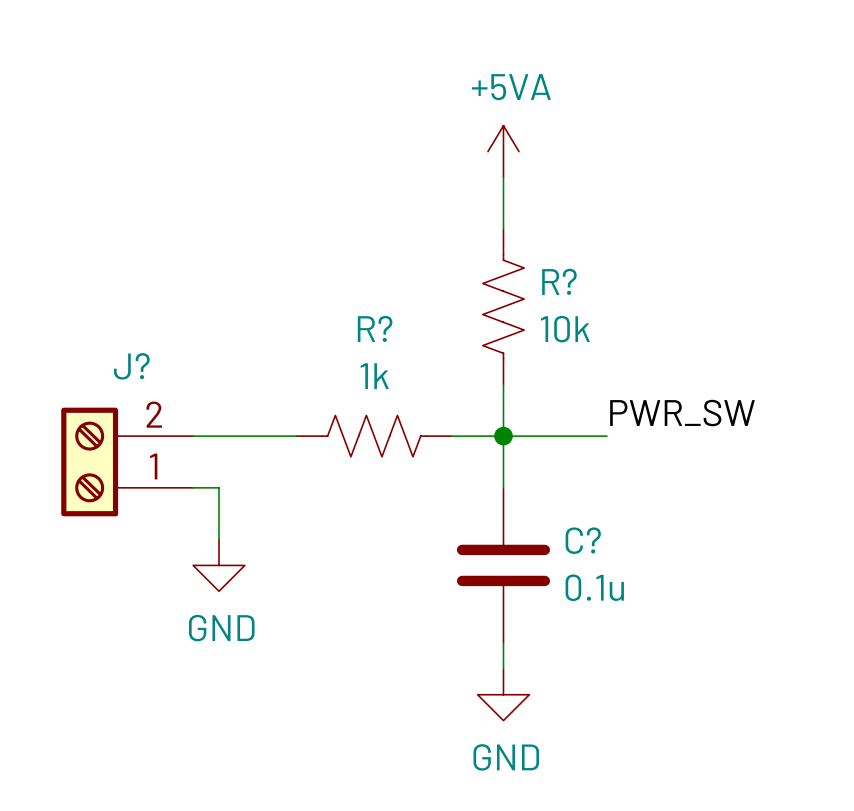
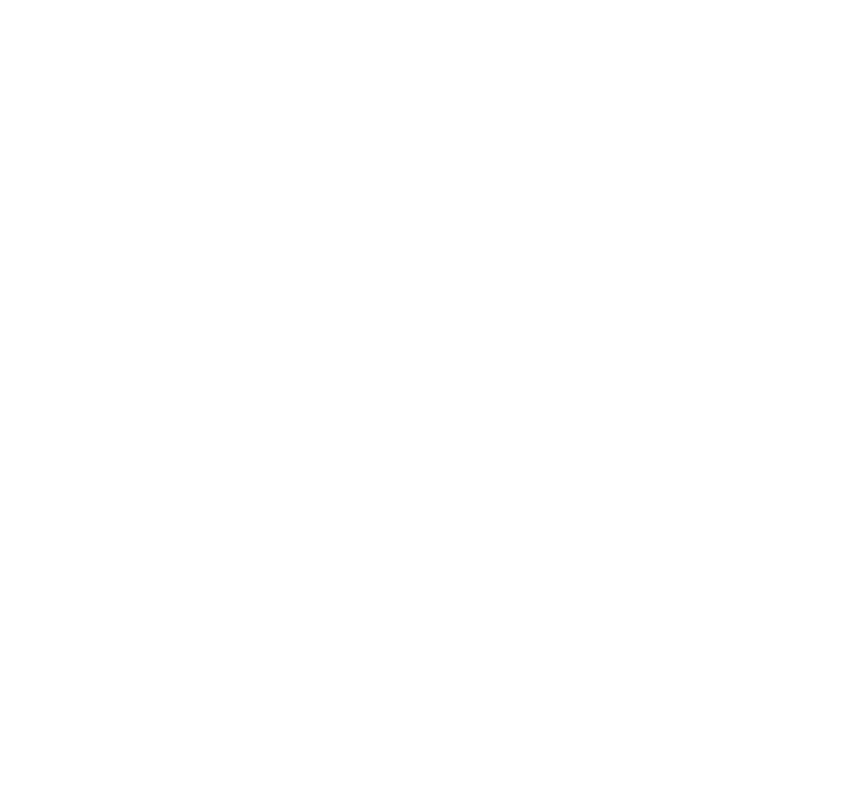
power symbol: +5VA (503, 151) -> none
wire: (503, 177) (503, 229) -> none
R?: 10k (503, 306) -> none
wire: (503, 384) (503, 487) -> none
label: PWR_SW (682, 413) -> none
wire: (193, 436) (296, 436) -> none
R?: 1k (374, 436) -> none
wire: (451, 436) (606, 436) -> none
junction: (503, 436) -> none
J?: (127, 461) -> none
wire: (193, 487) (218, 487) (218, 539) -> none
power symbol: GND (218, 565) -> none
C?: 0.1u (503, 565) -> none
wire: (503, 643) (503, 668) -> none
power symbol: GND (503, 694) -> none

